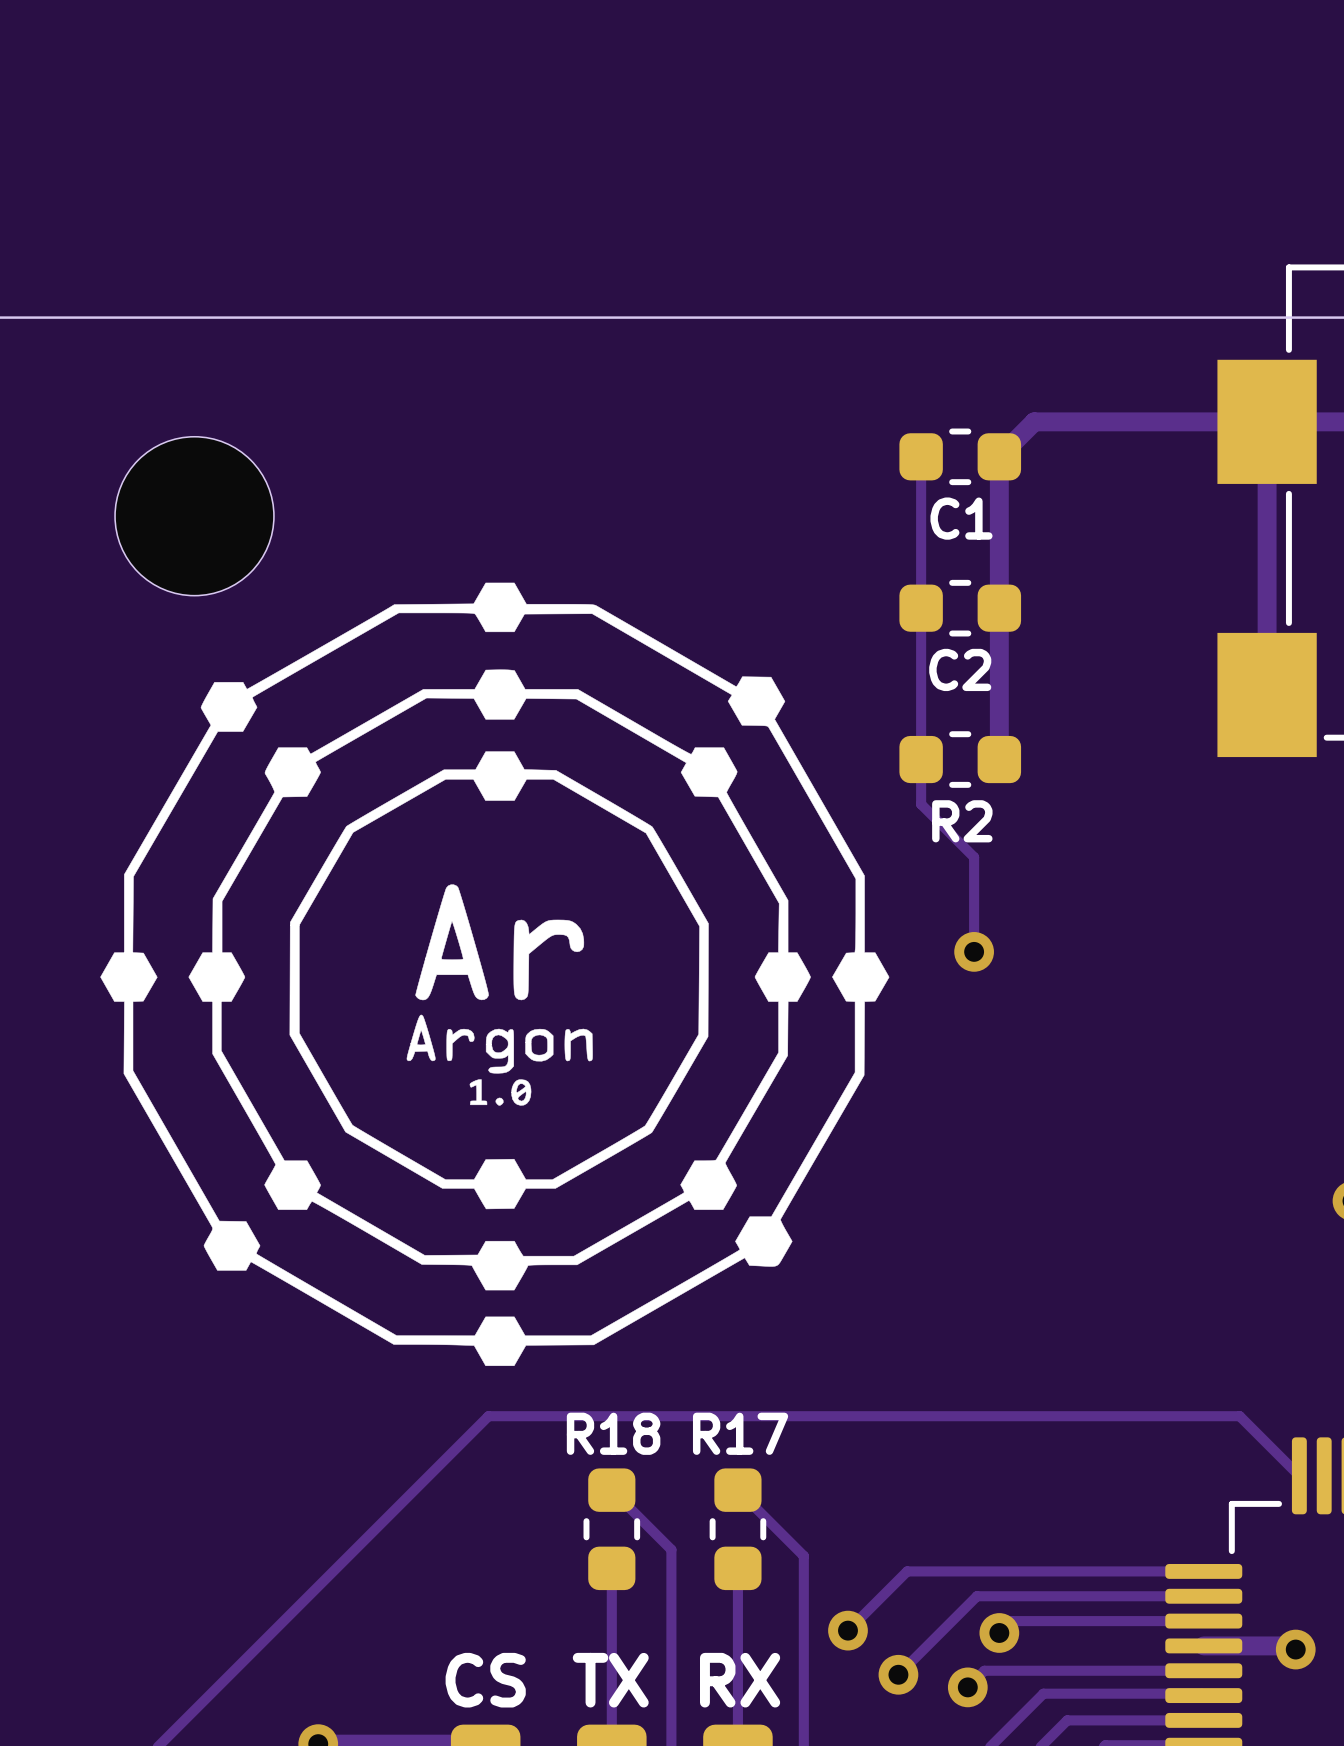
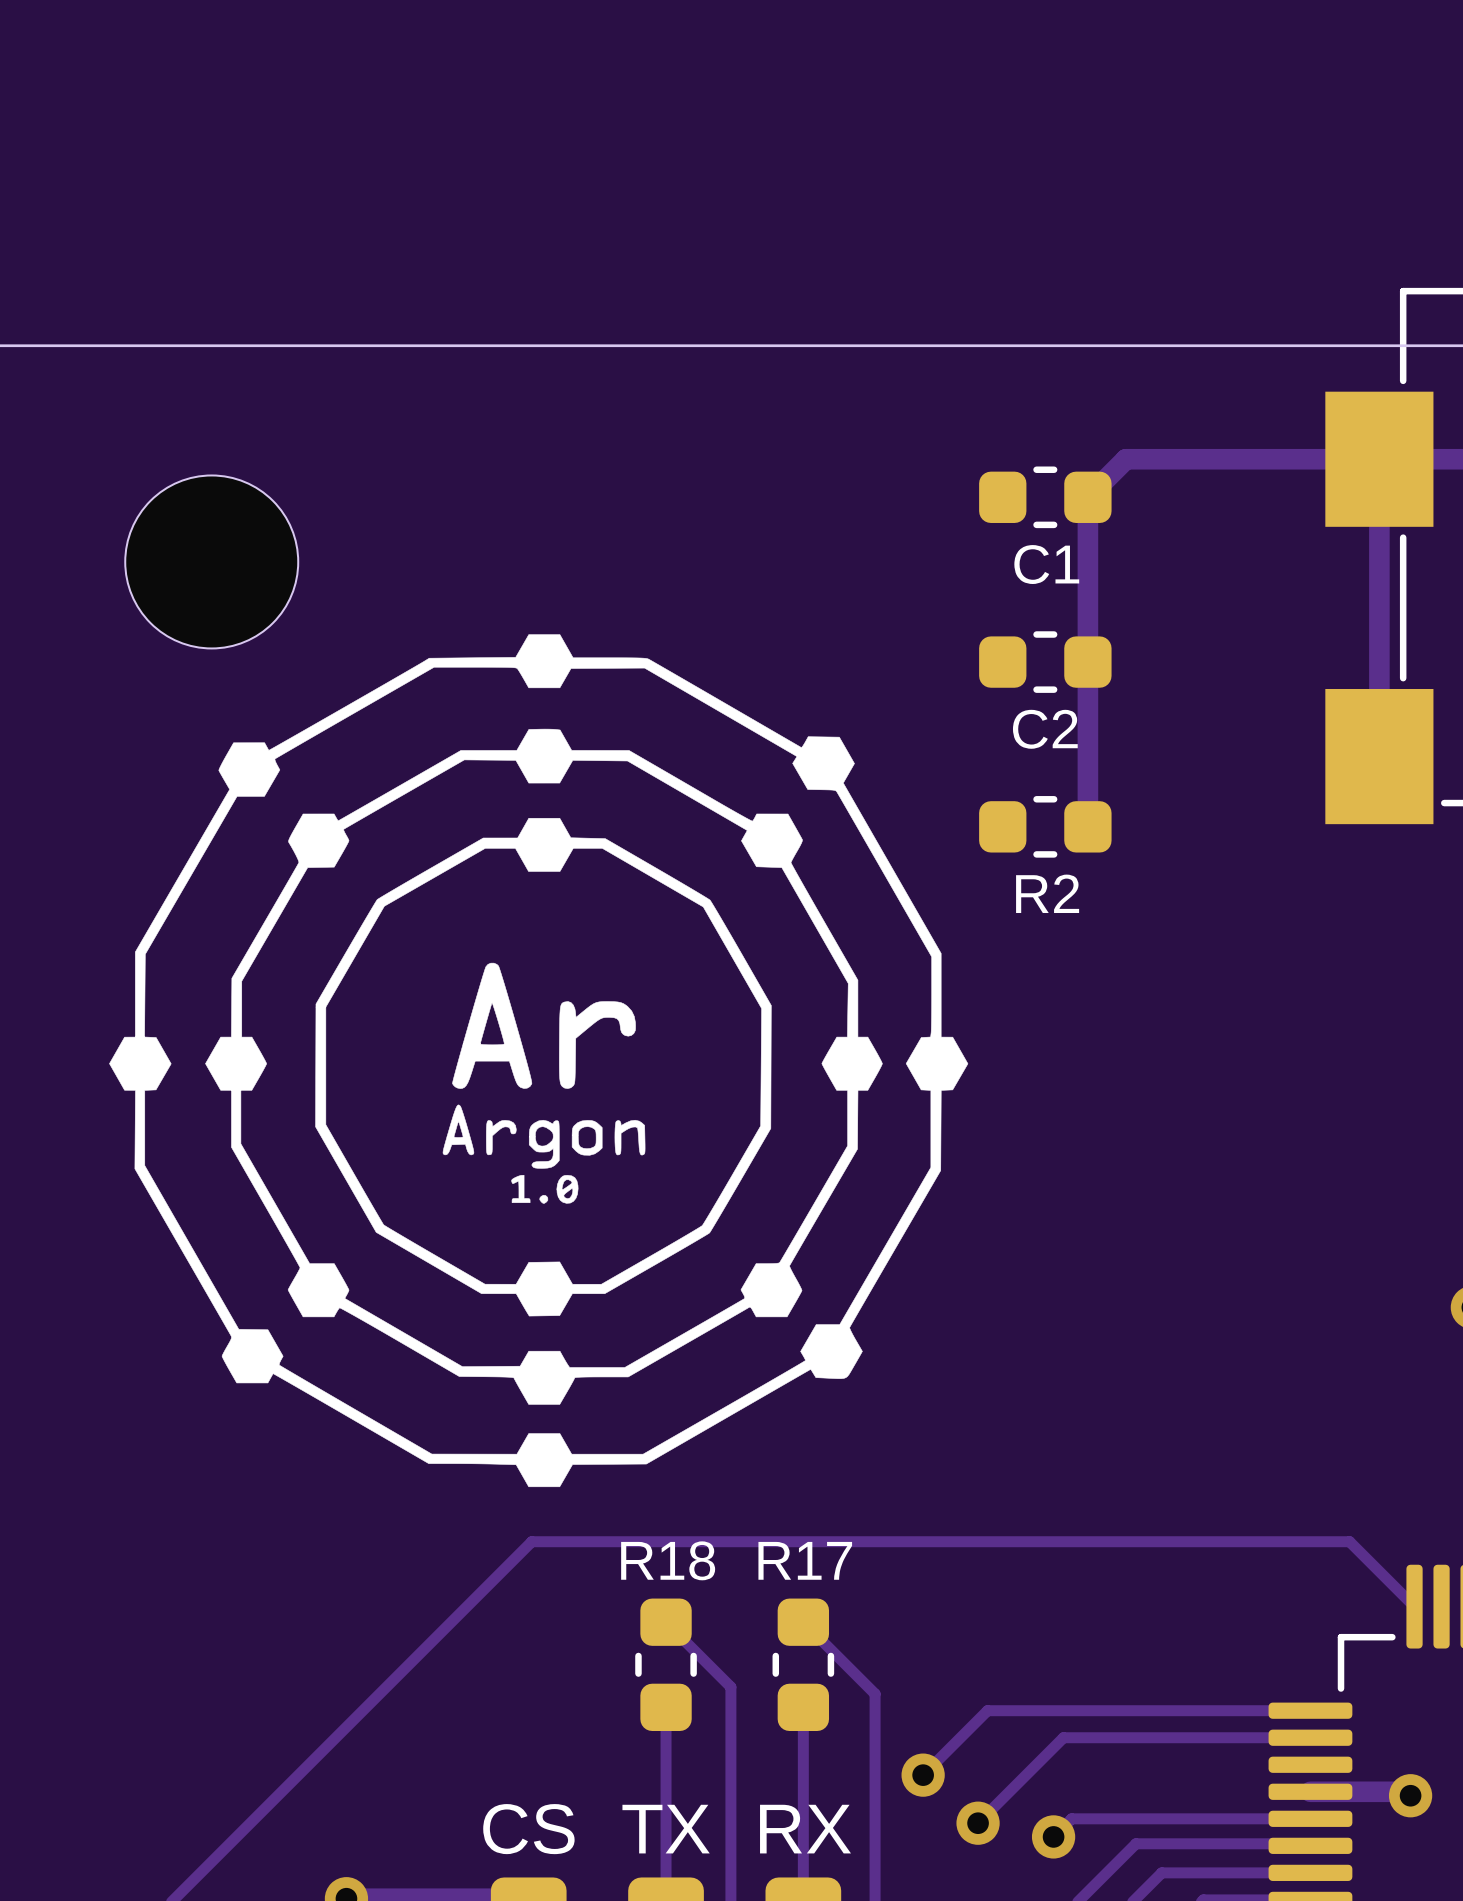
track: (921, 456) (921, 804) (974, 857) (974, 951) -> none
via: (974, 951) -> none
track: (1203, 1621) (1011, 1621) (999, 1632) -> none
via: (999, 1632) -> none

